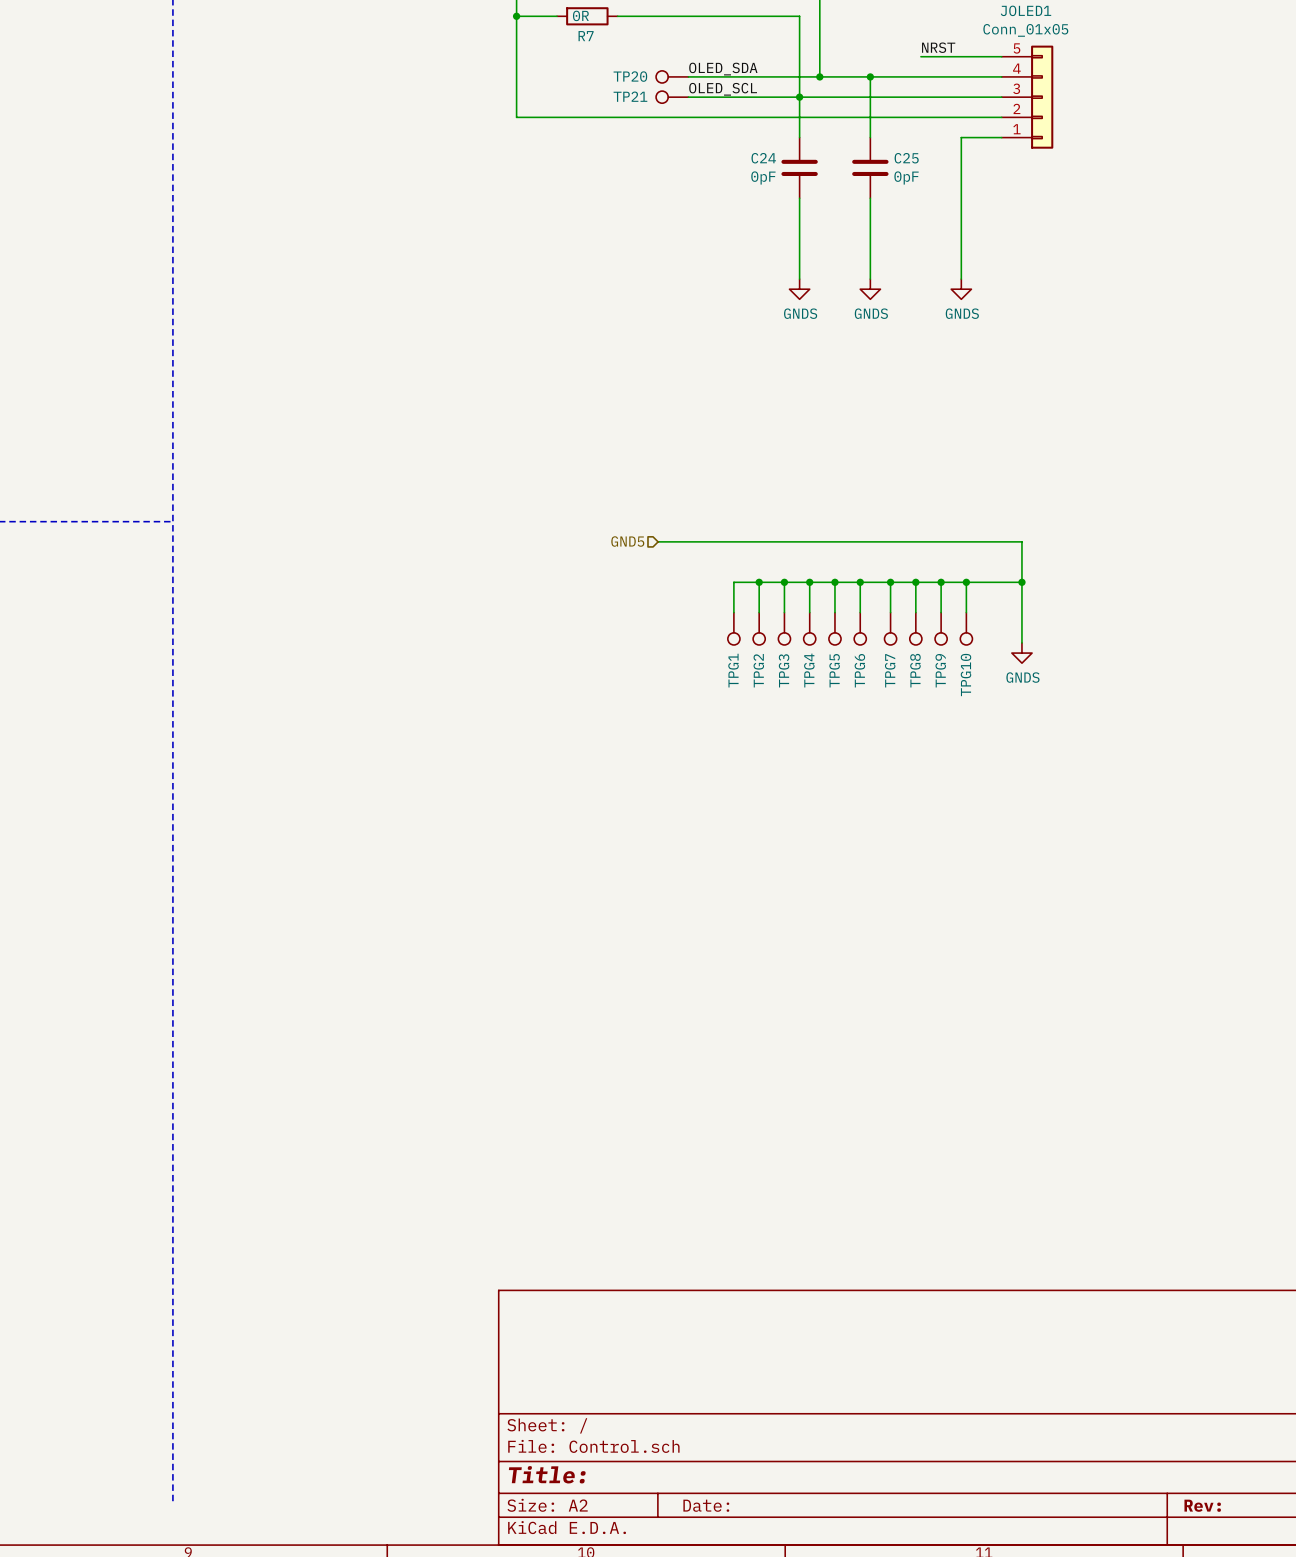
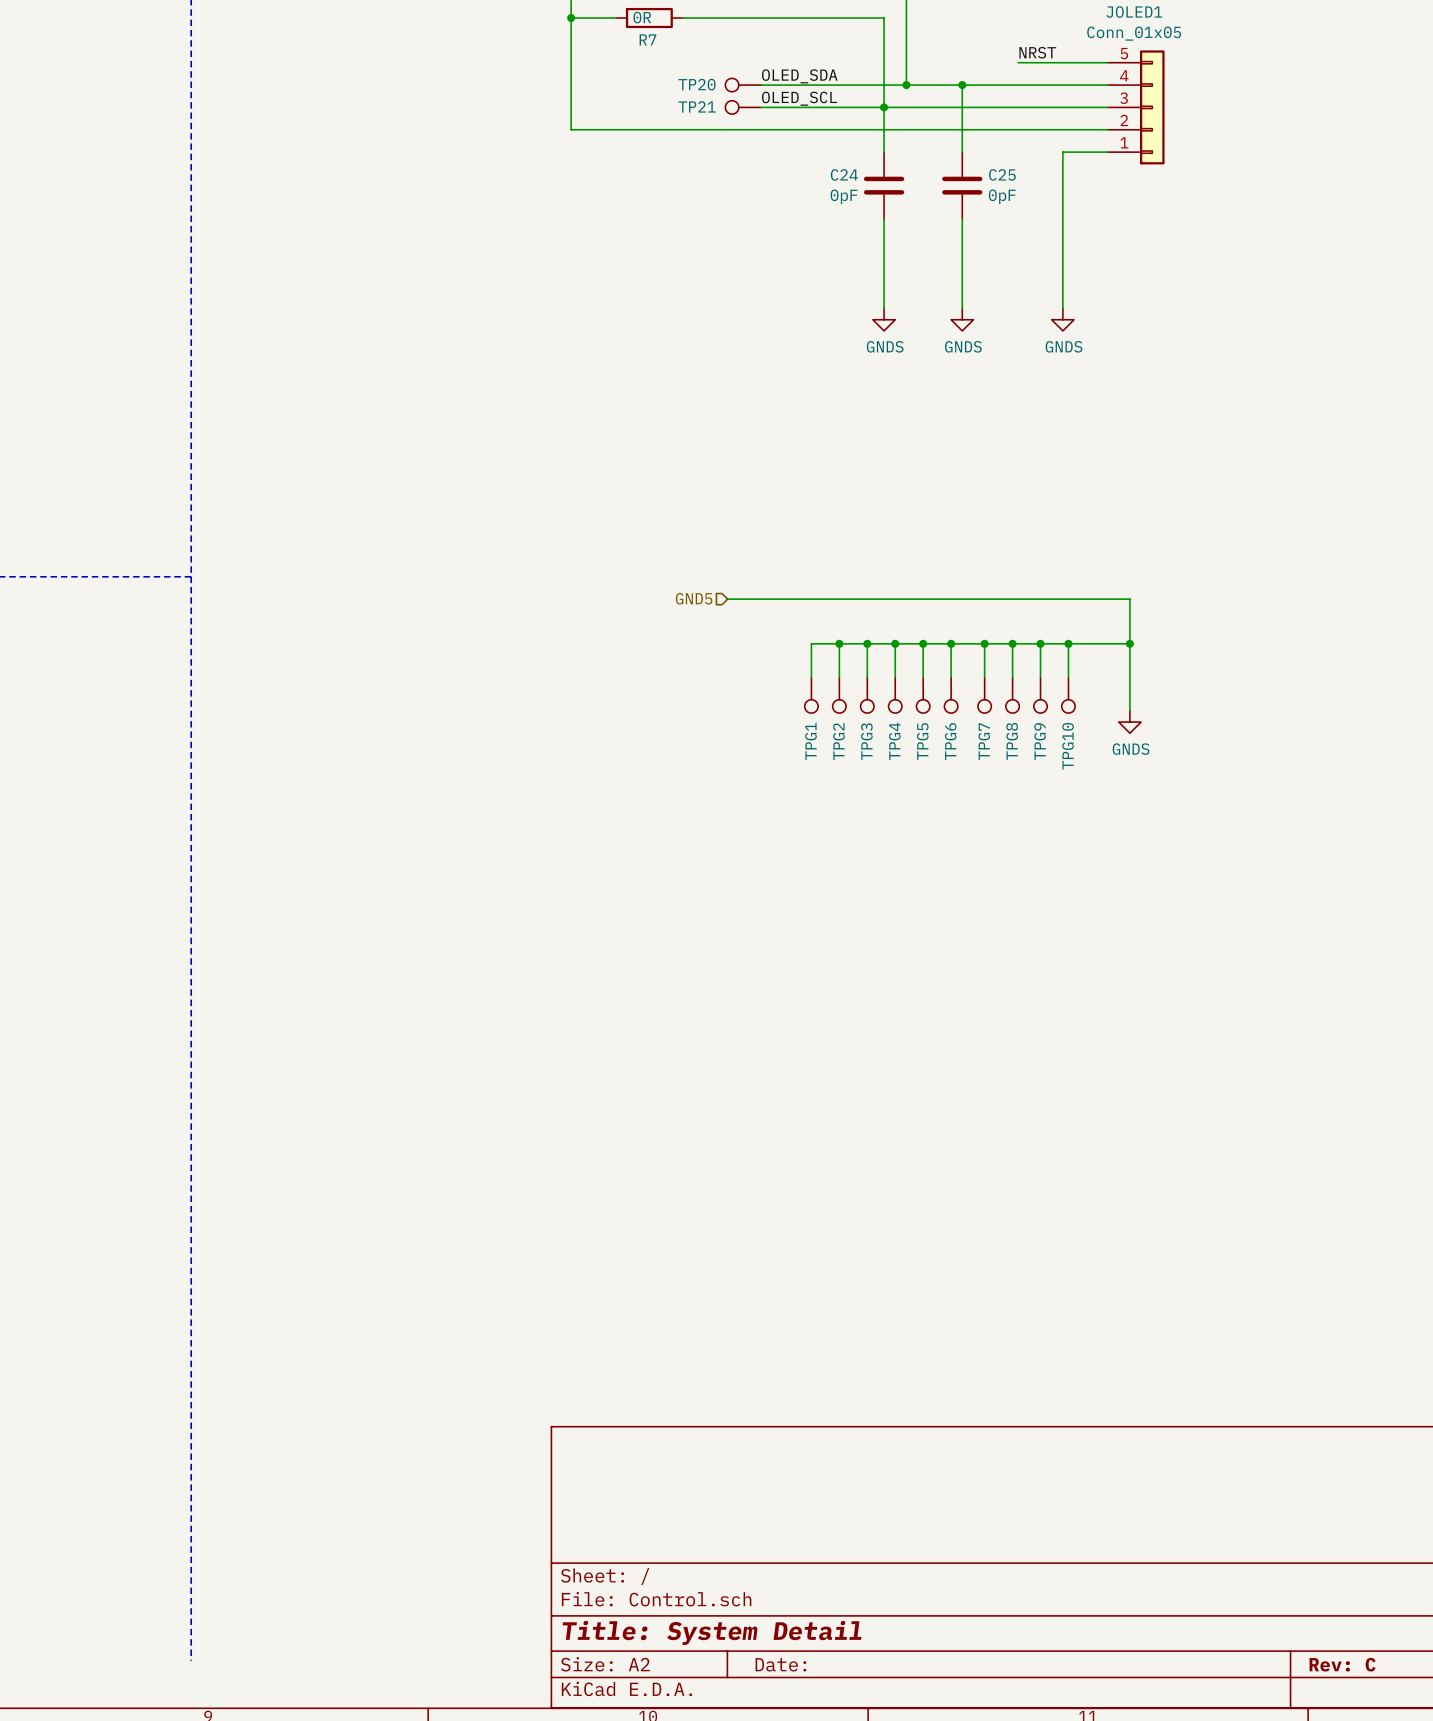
title block: Title: (547, 1474) -> Title: System Detail (712, 1632)
title block: Rev: (1202, 1505) -> Rev: C (1342, 1664)

